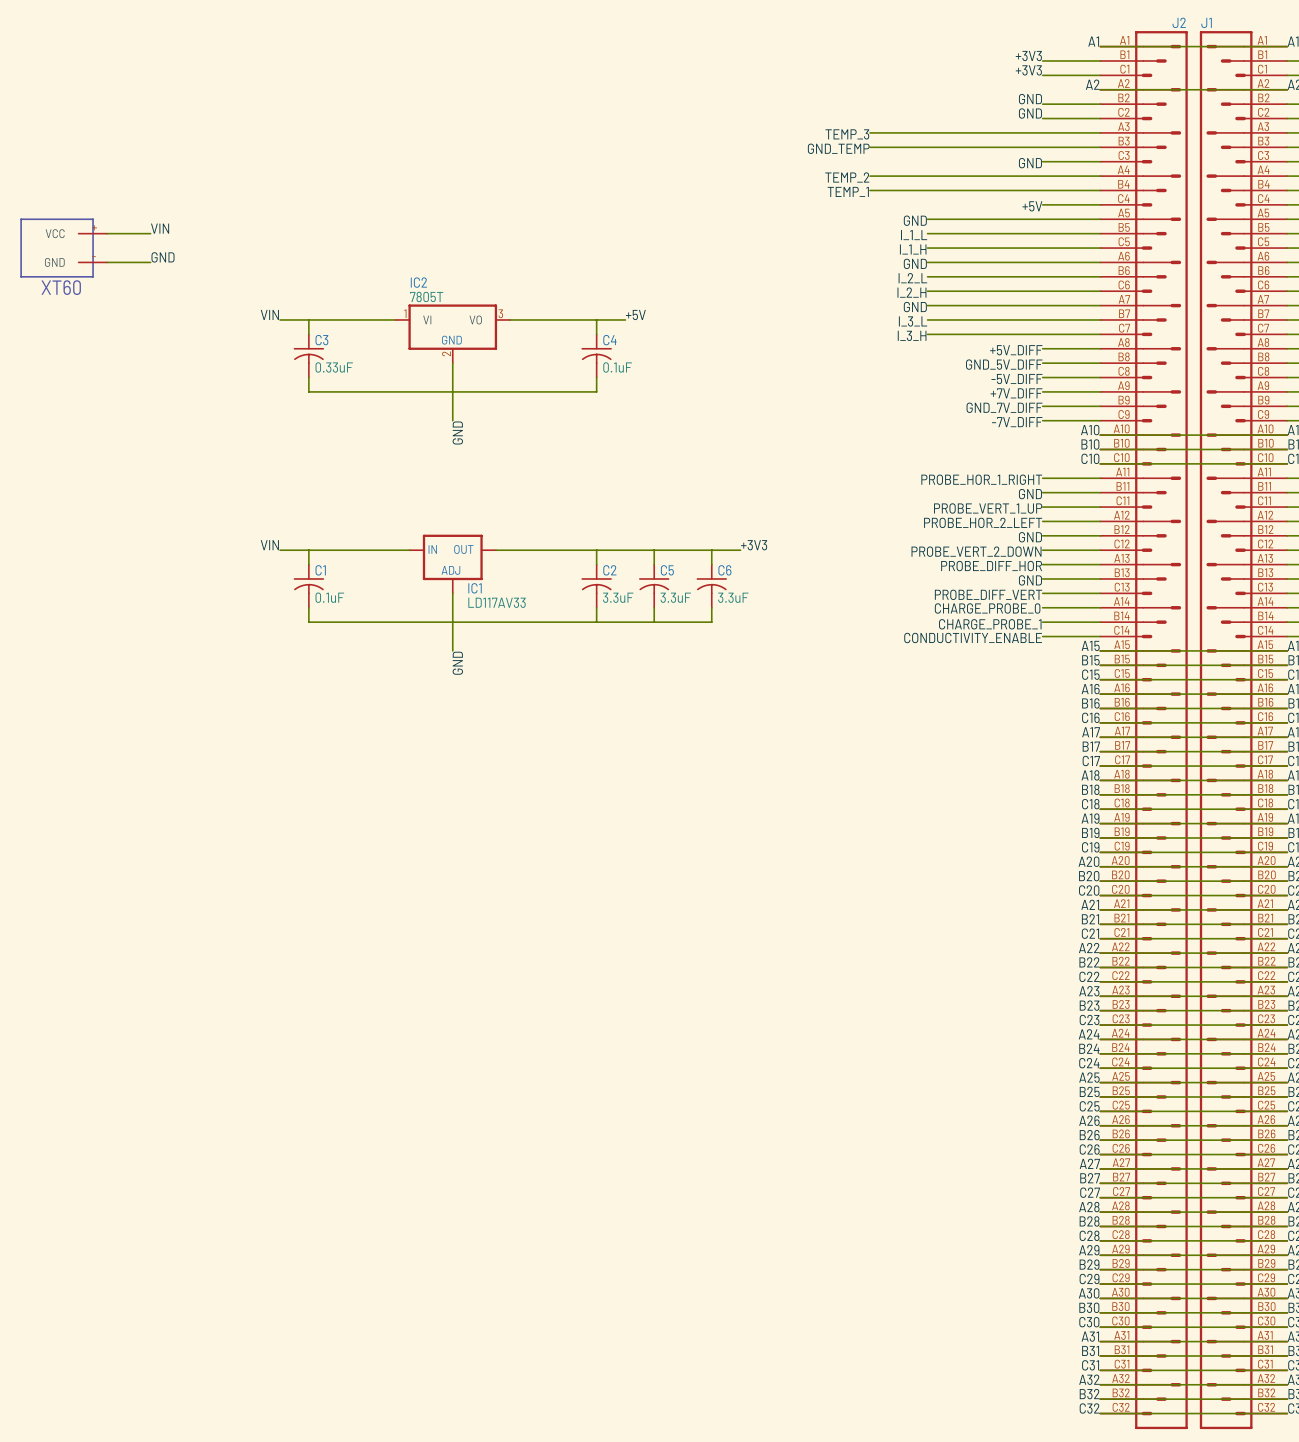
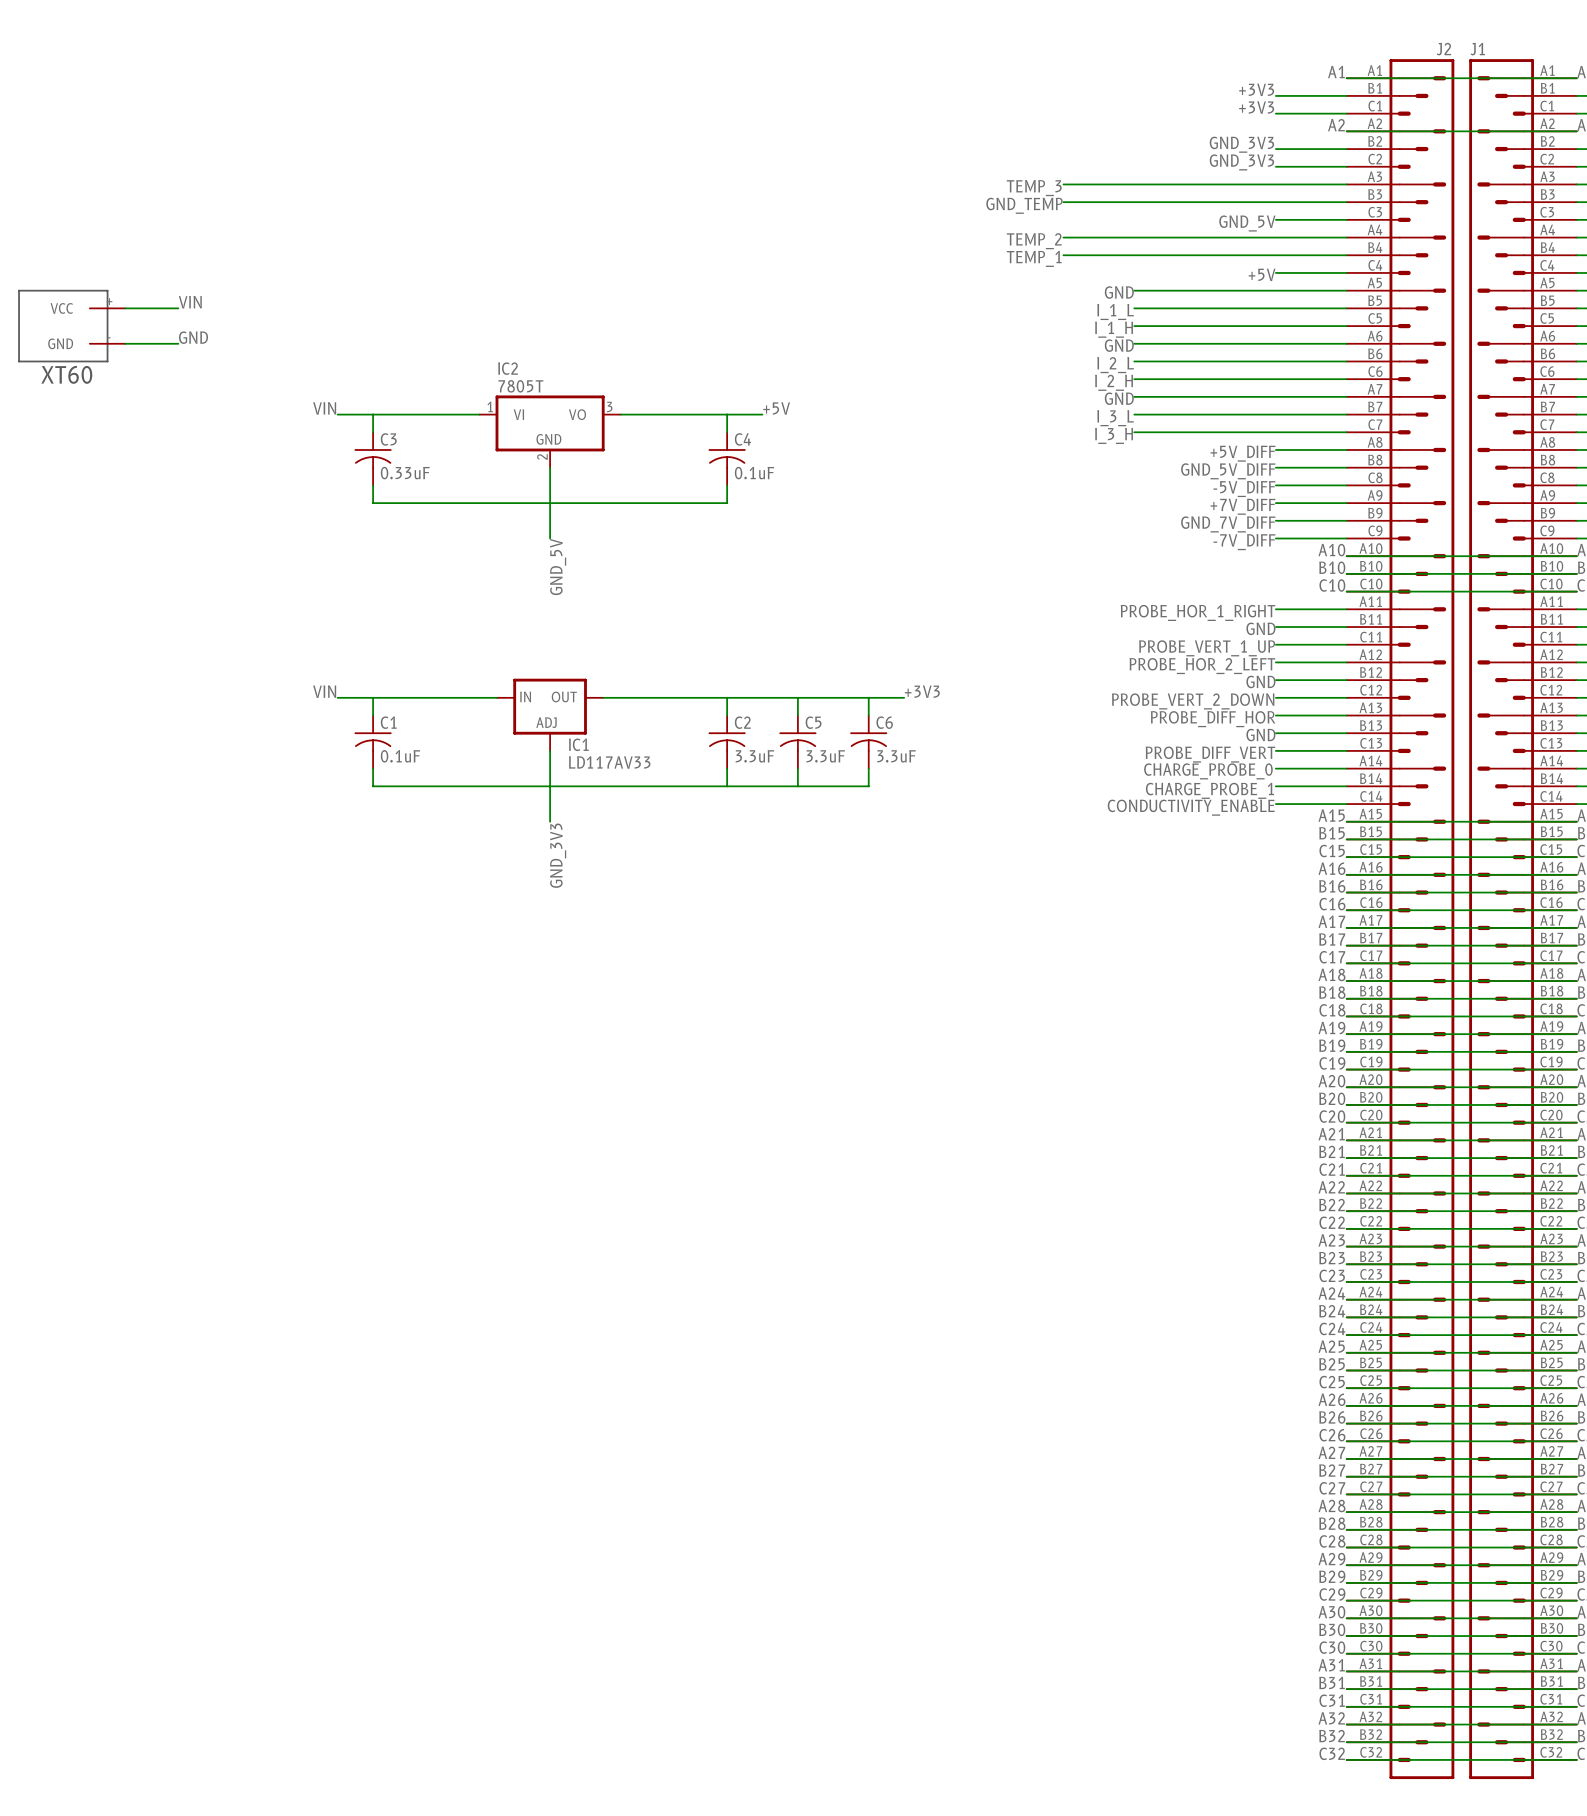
label: GND (1030, 99) -> GND_3V3 (1241, 144)
label: GND (1030, 113) -> GND_3V3 (1241, 162)
label: GND (1030, 163) -> GND_5V (1247, 223)
label: GND (457, 432) -> GND_5V (558, 567)
label: GND (457, 663) -> GND_3V3 (558, 855)

